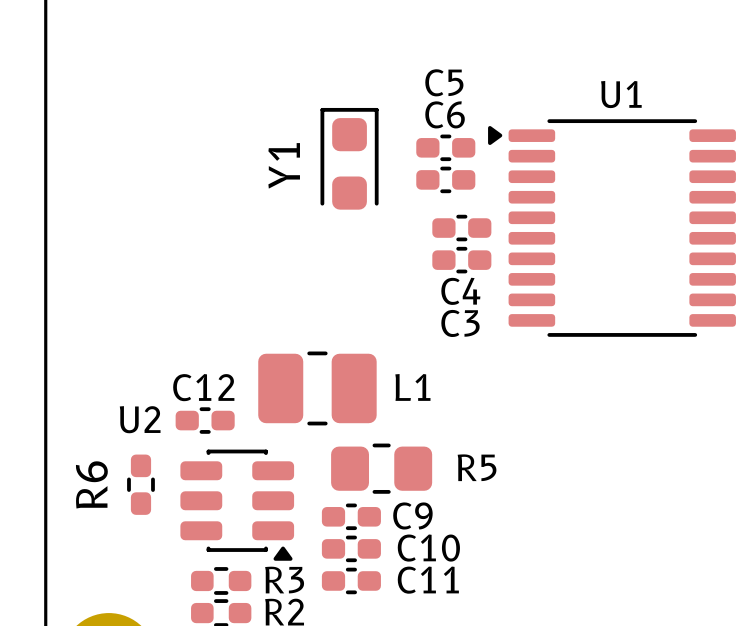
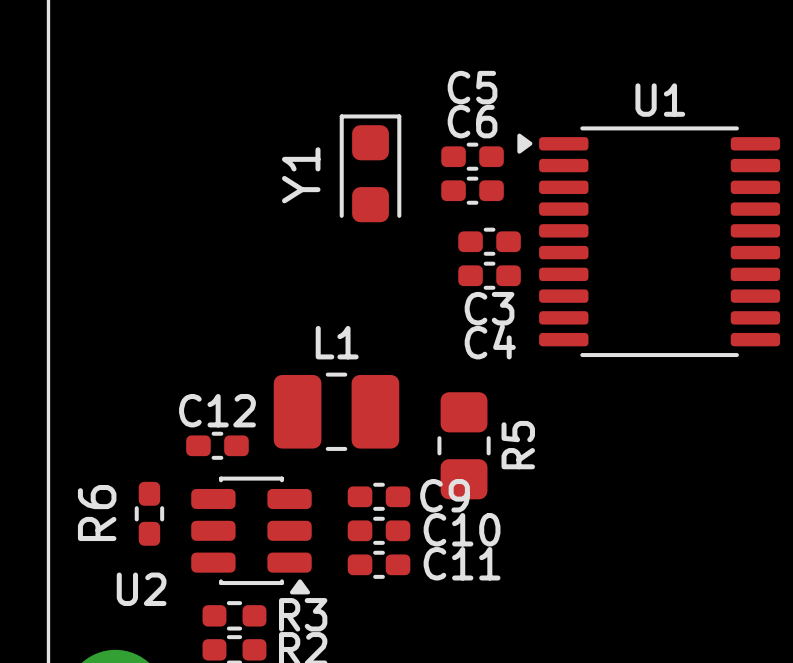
C4 name: C4 (460, 291) -> C3 (489, 308)
C3 name: C3 (460, 323) -> C4 (490, 342)
L1 name position: L1 (412, 387) -> L1 (337, 342)
U2 name position: U2 (140, 419) -> U2 (141, 589)
R5 rotation: 0° (381, 468) -> 90° clockwise (464, 445)
R5 position: (381, 468) -> (464, 445)
C9 position: (351, 516) -> (379, 496)
C10 position: (351, 548) -> (379, 530)
C11 position: (351, 580) -> (379, 564)

